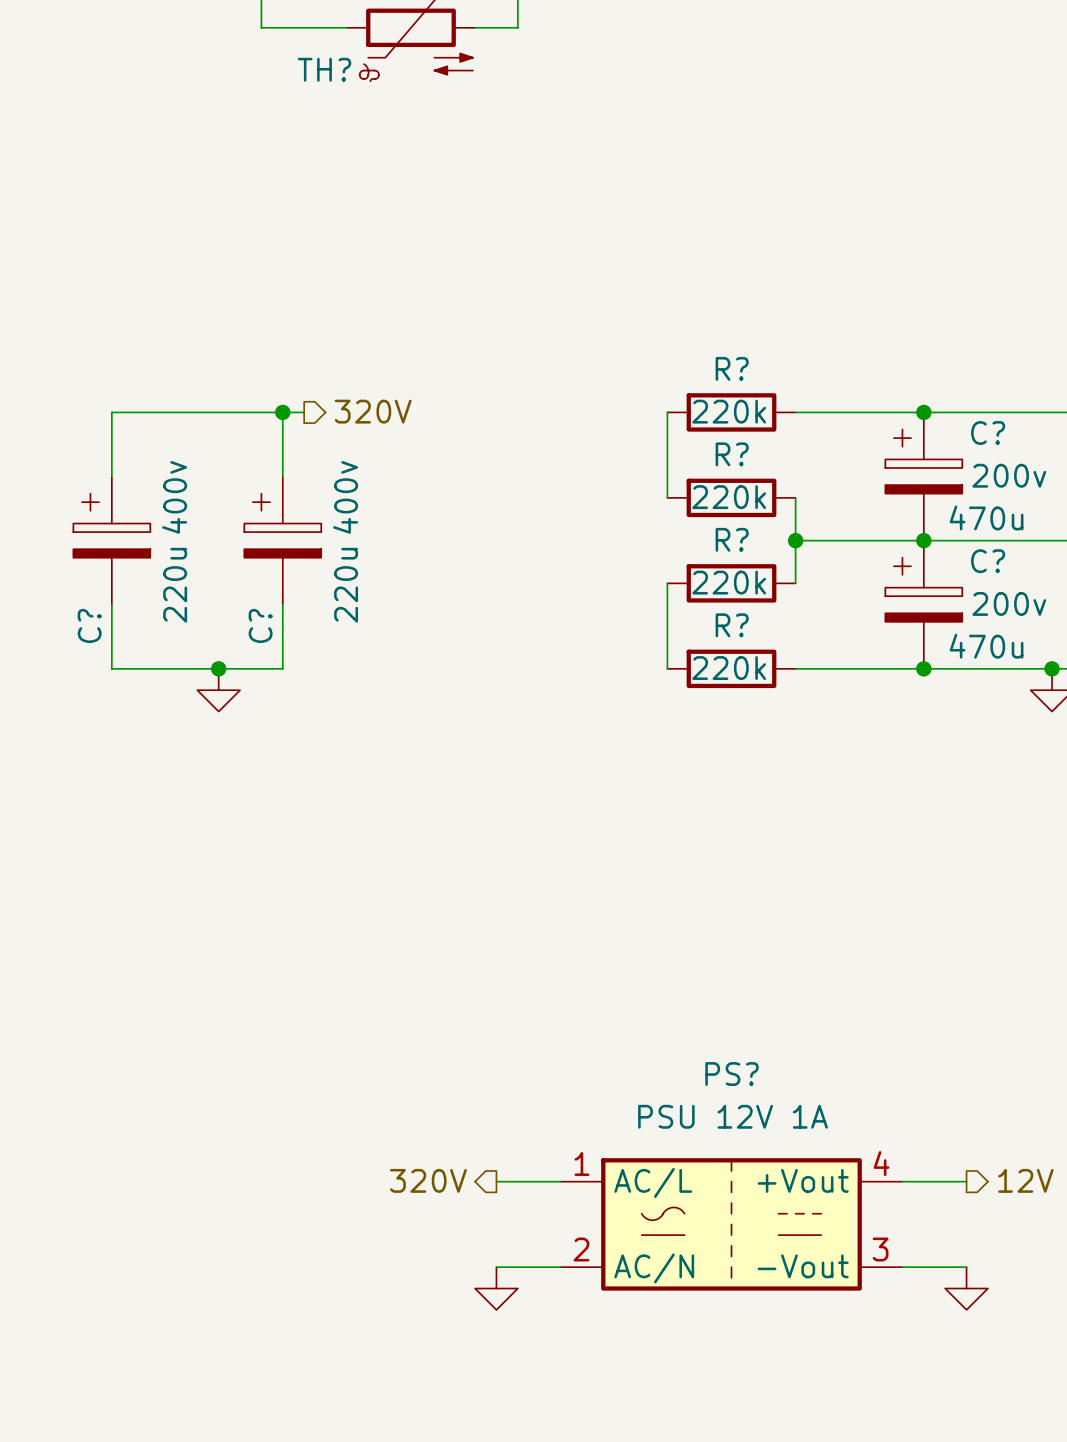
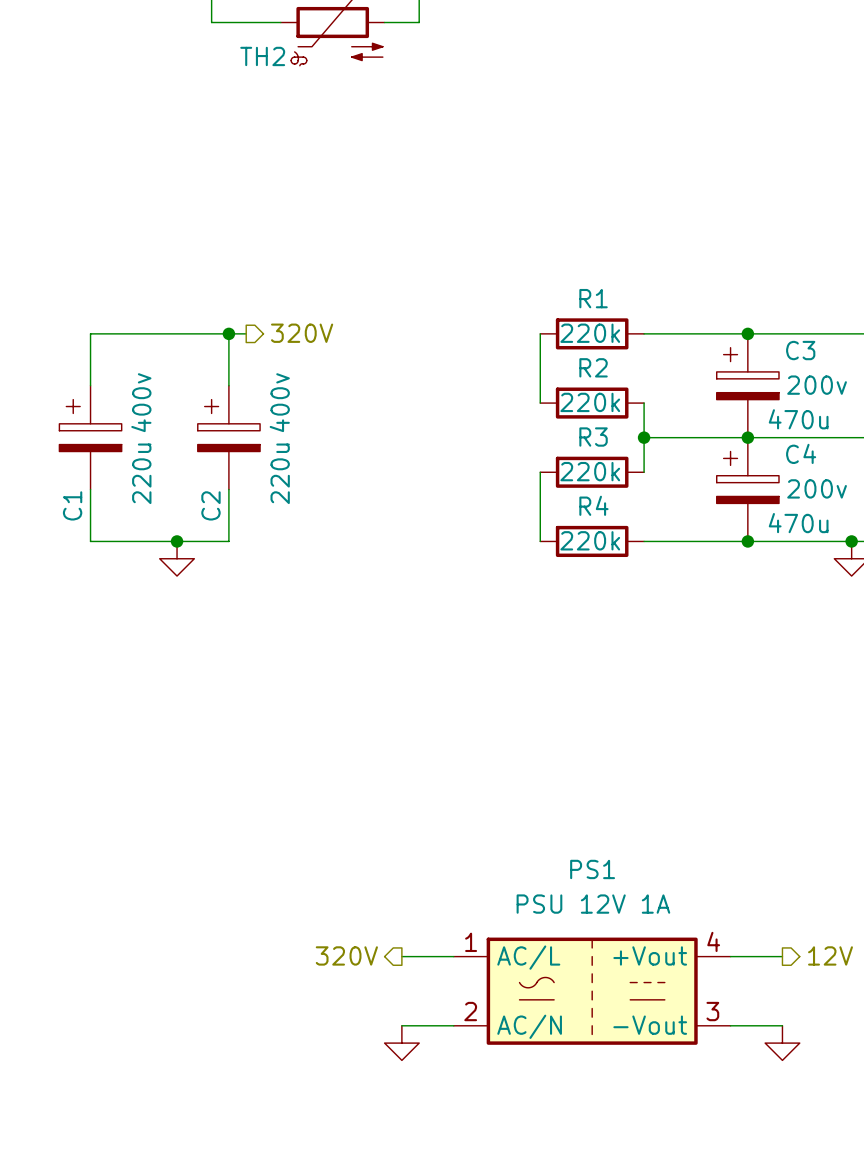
TH? name: TH? (324, 69) -> TH2 (262, 56)
R? name: R? (732, 368) -> R1 (593, 298)
C? name: C? (988, 433) -> C3 (800, 350)
R? name: R? (732, 454) -> R2 (593, 367)
R? name: R? (732, 539) -> R3 (593, 437)
C? name: C? (988, 561) -> C4 (801, 453)
C? name: C? (89, 625) -> C1 (72, 505)
C? name: C? (260, 625) -> C2 (210, 505)
R? name: R? (732, 625) -> R4 (593, 505)
PS? name: PS? (732, 1074) -> PS1 (592, 869)

